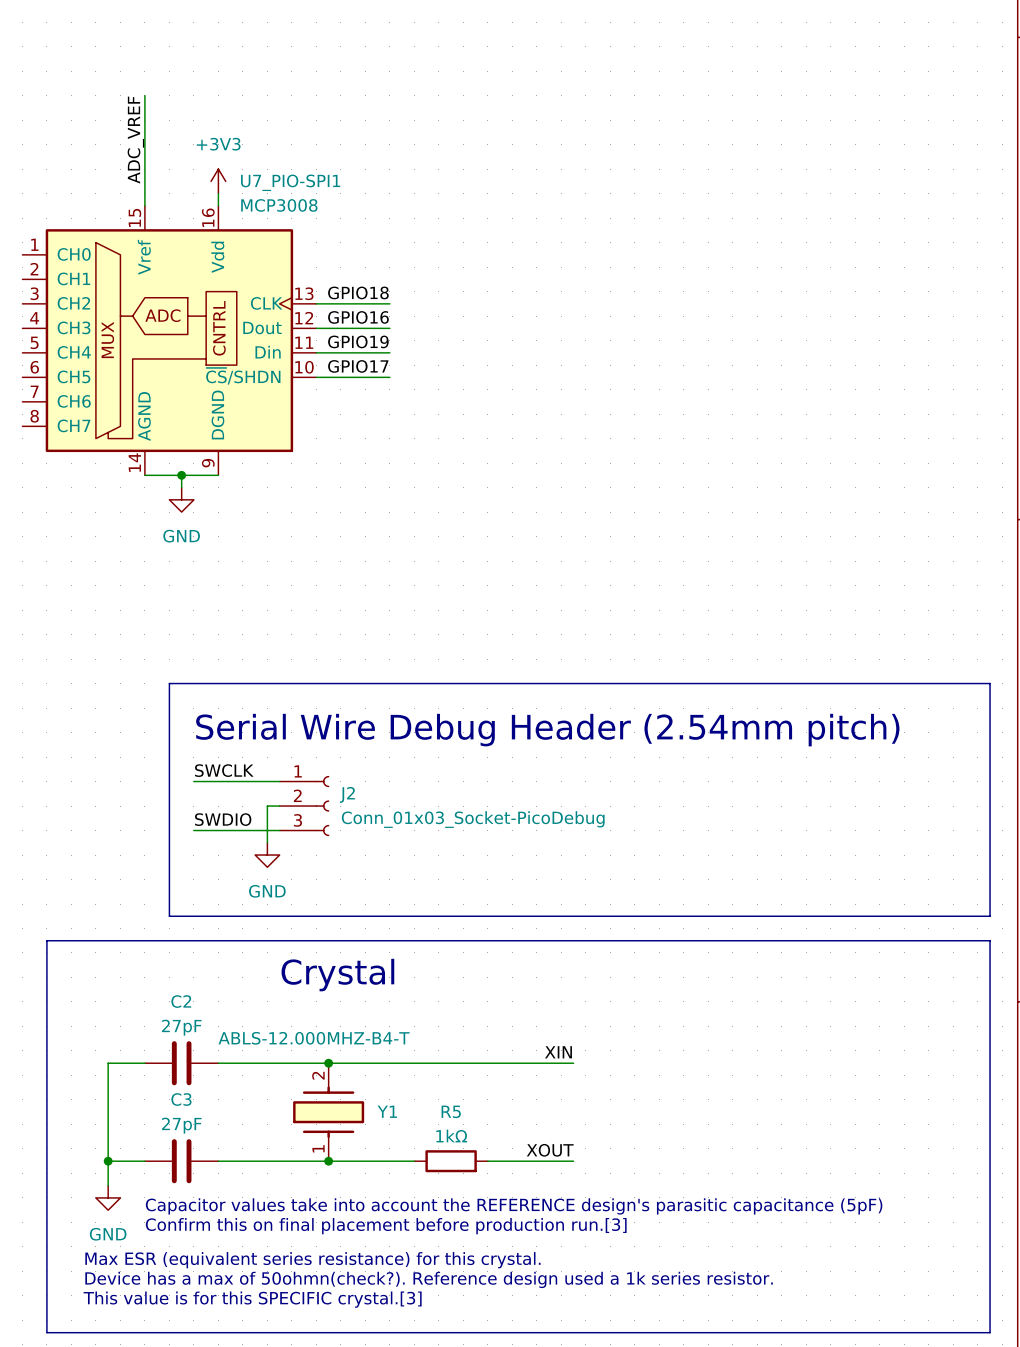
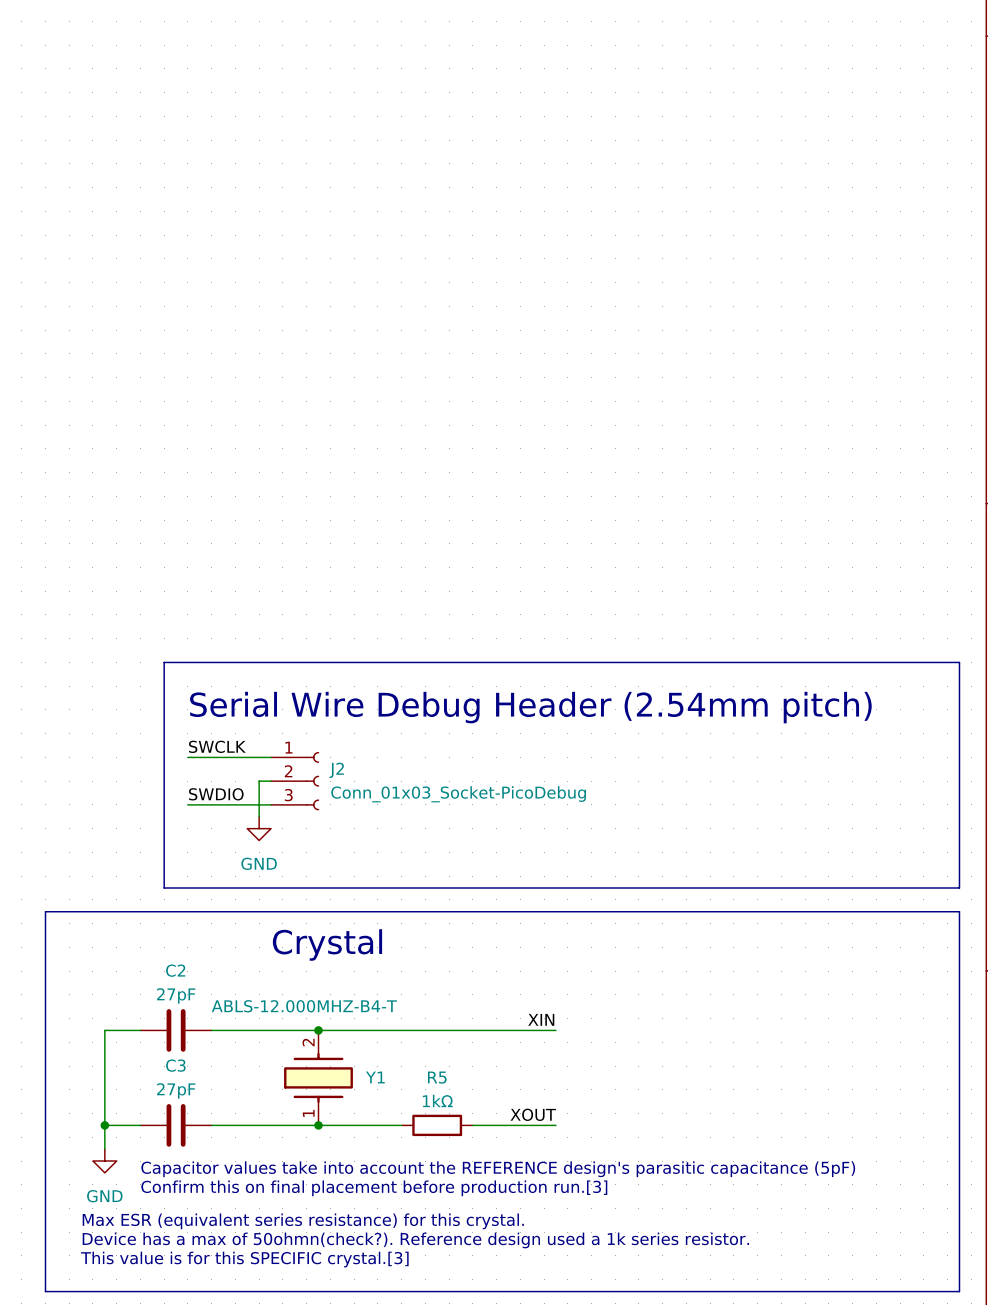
wire: (144, 95) (144, 205) -> none
label: ADC_VREF (135, 140) -> none
power symbol: +3V3 (218, 181) -> none
wire: (218, 193) (218, 205) -> none
label: GPIO18 (358, 292) -> none
wire: (316, 303) (389, 303) -> none
label: GPIO16 (358, 317) -> none
wire: (316, 328) (389, 328) -> none
U7_PIO-SPI1: MCP3008 (169, 340) -> none
label: GPIO19 (358, 341) -> none
wire: (316, 352) (389, 352) -> none
label: GPIO17 (358, 366) -> none
wire: (316, 377) (389, 377) -> none
wire: (144, 475) (218, 475) -> none
wire: (181, 475) (181, 487) -> none
junction: (181, 475) -> none
power symbol: GND (181, 499) -> none

